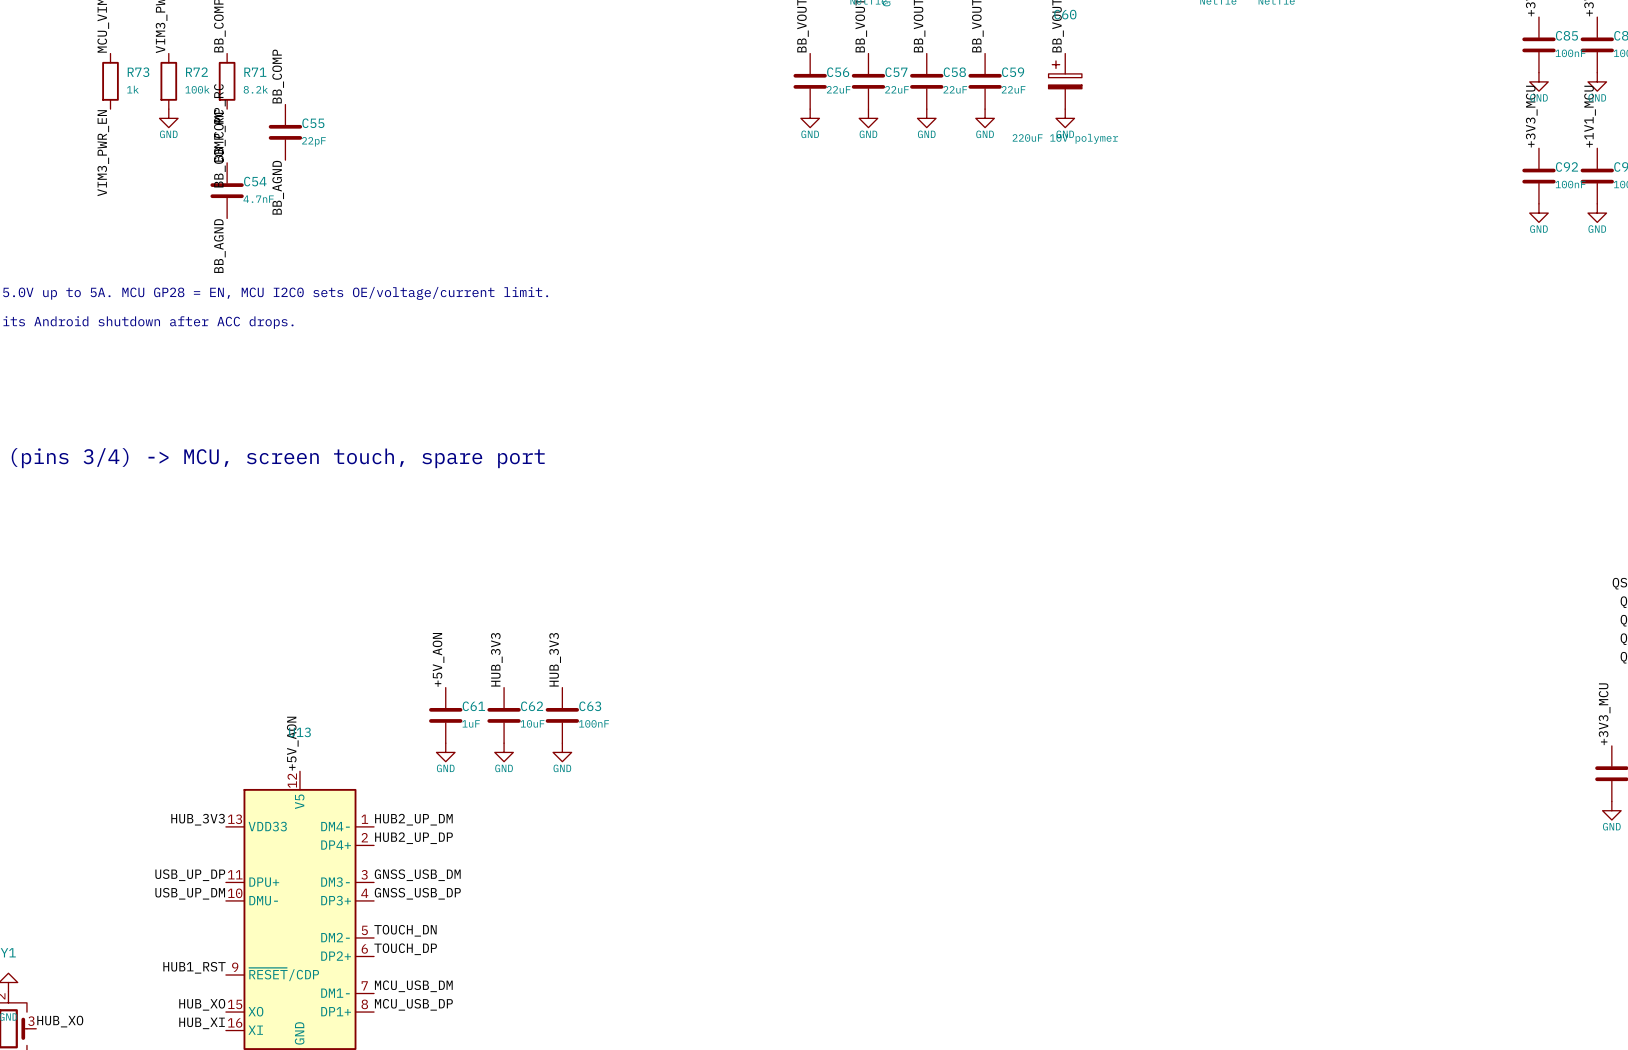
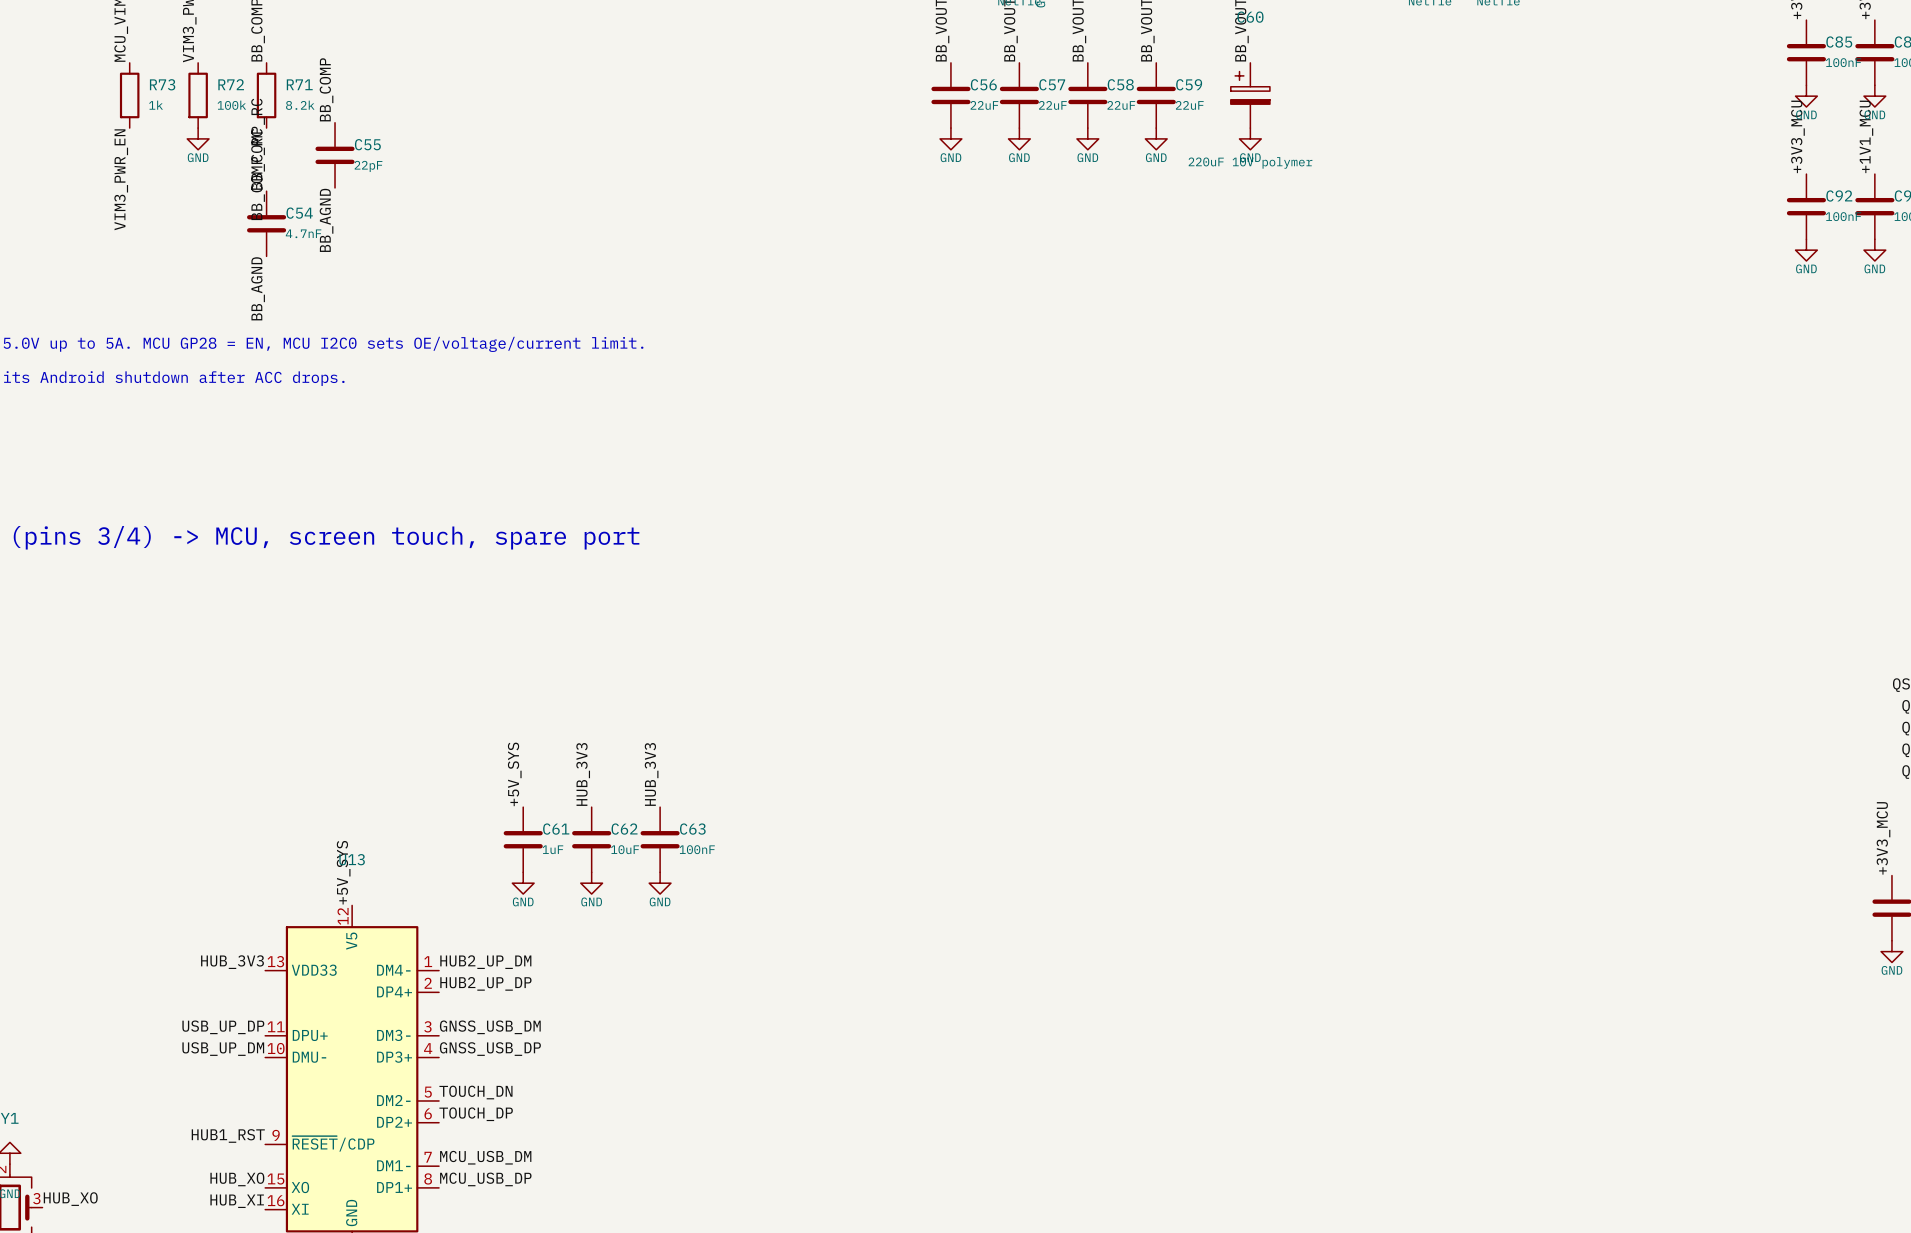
label: +5V_AON (438, 659) -> +5V_SYS (514, 774)
label: +5V_AON (292, 743) -> +5V_SYS (343, 872)

